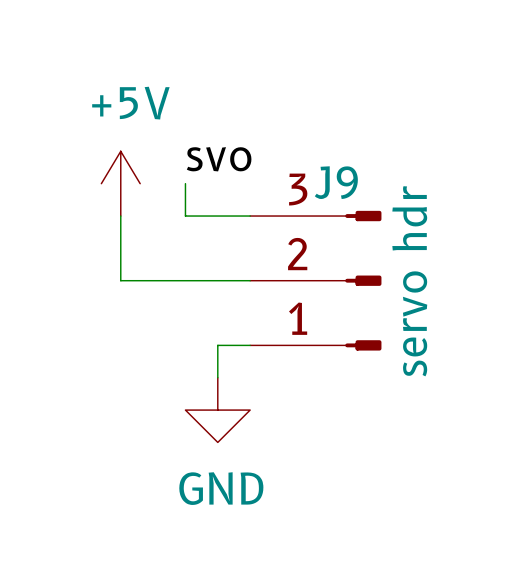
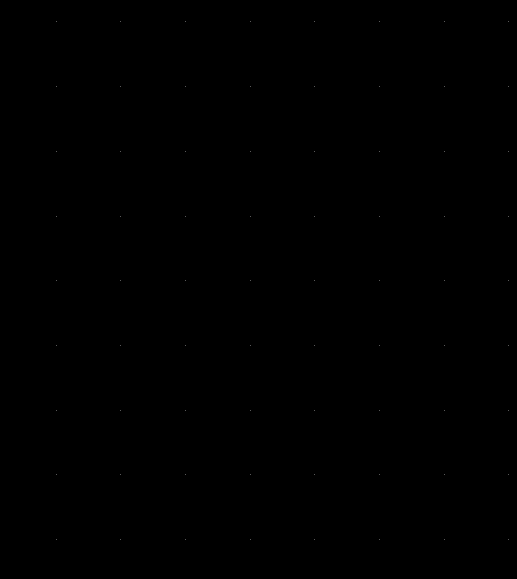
label: svo (219, 159) -> none
power symbol: +5V (120, 183) -> none
wire: (185, 183) (185, 216) (250, 216) -> none
wire: (120, 216) (120, 280) (250, 280) -> none
J9: servo hdr (315, 280) -> none
wire: (250, 345) (217, 345) (217, 377) -> none
power symbol: GND (217, 410) -> none

